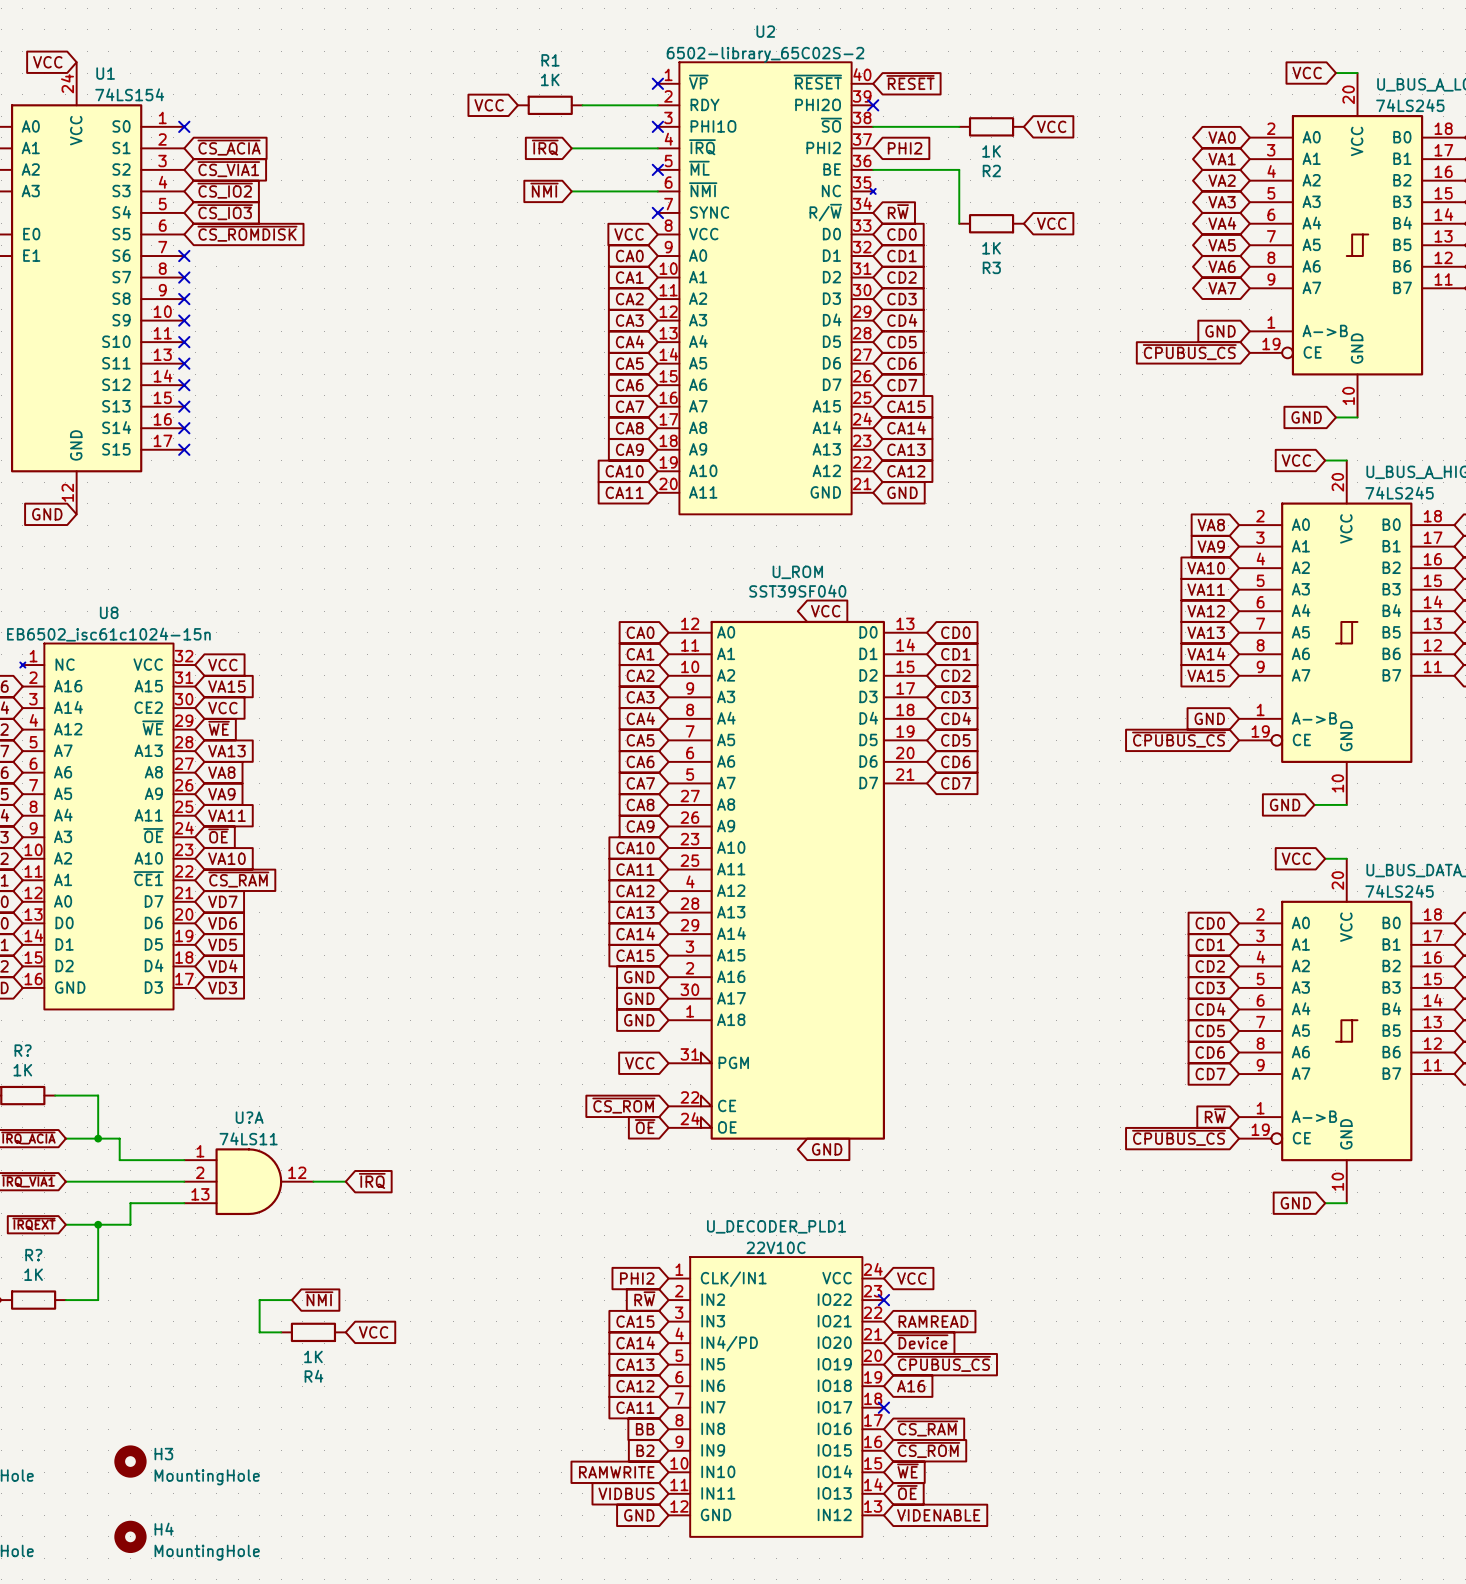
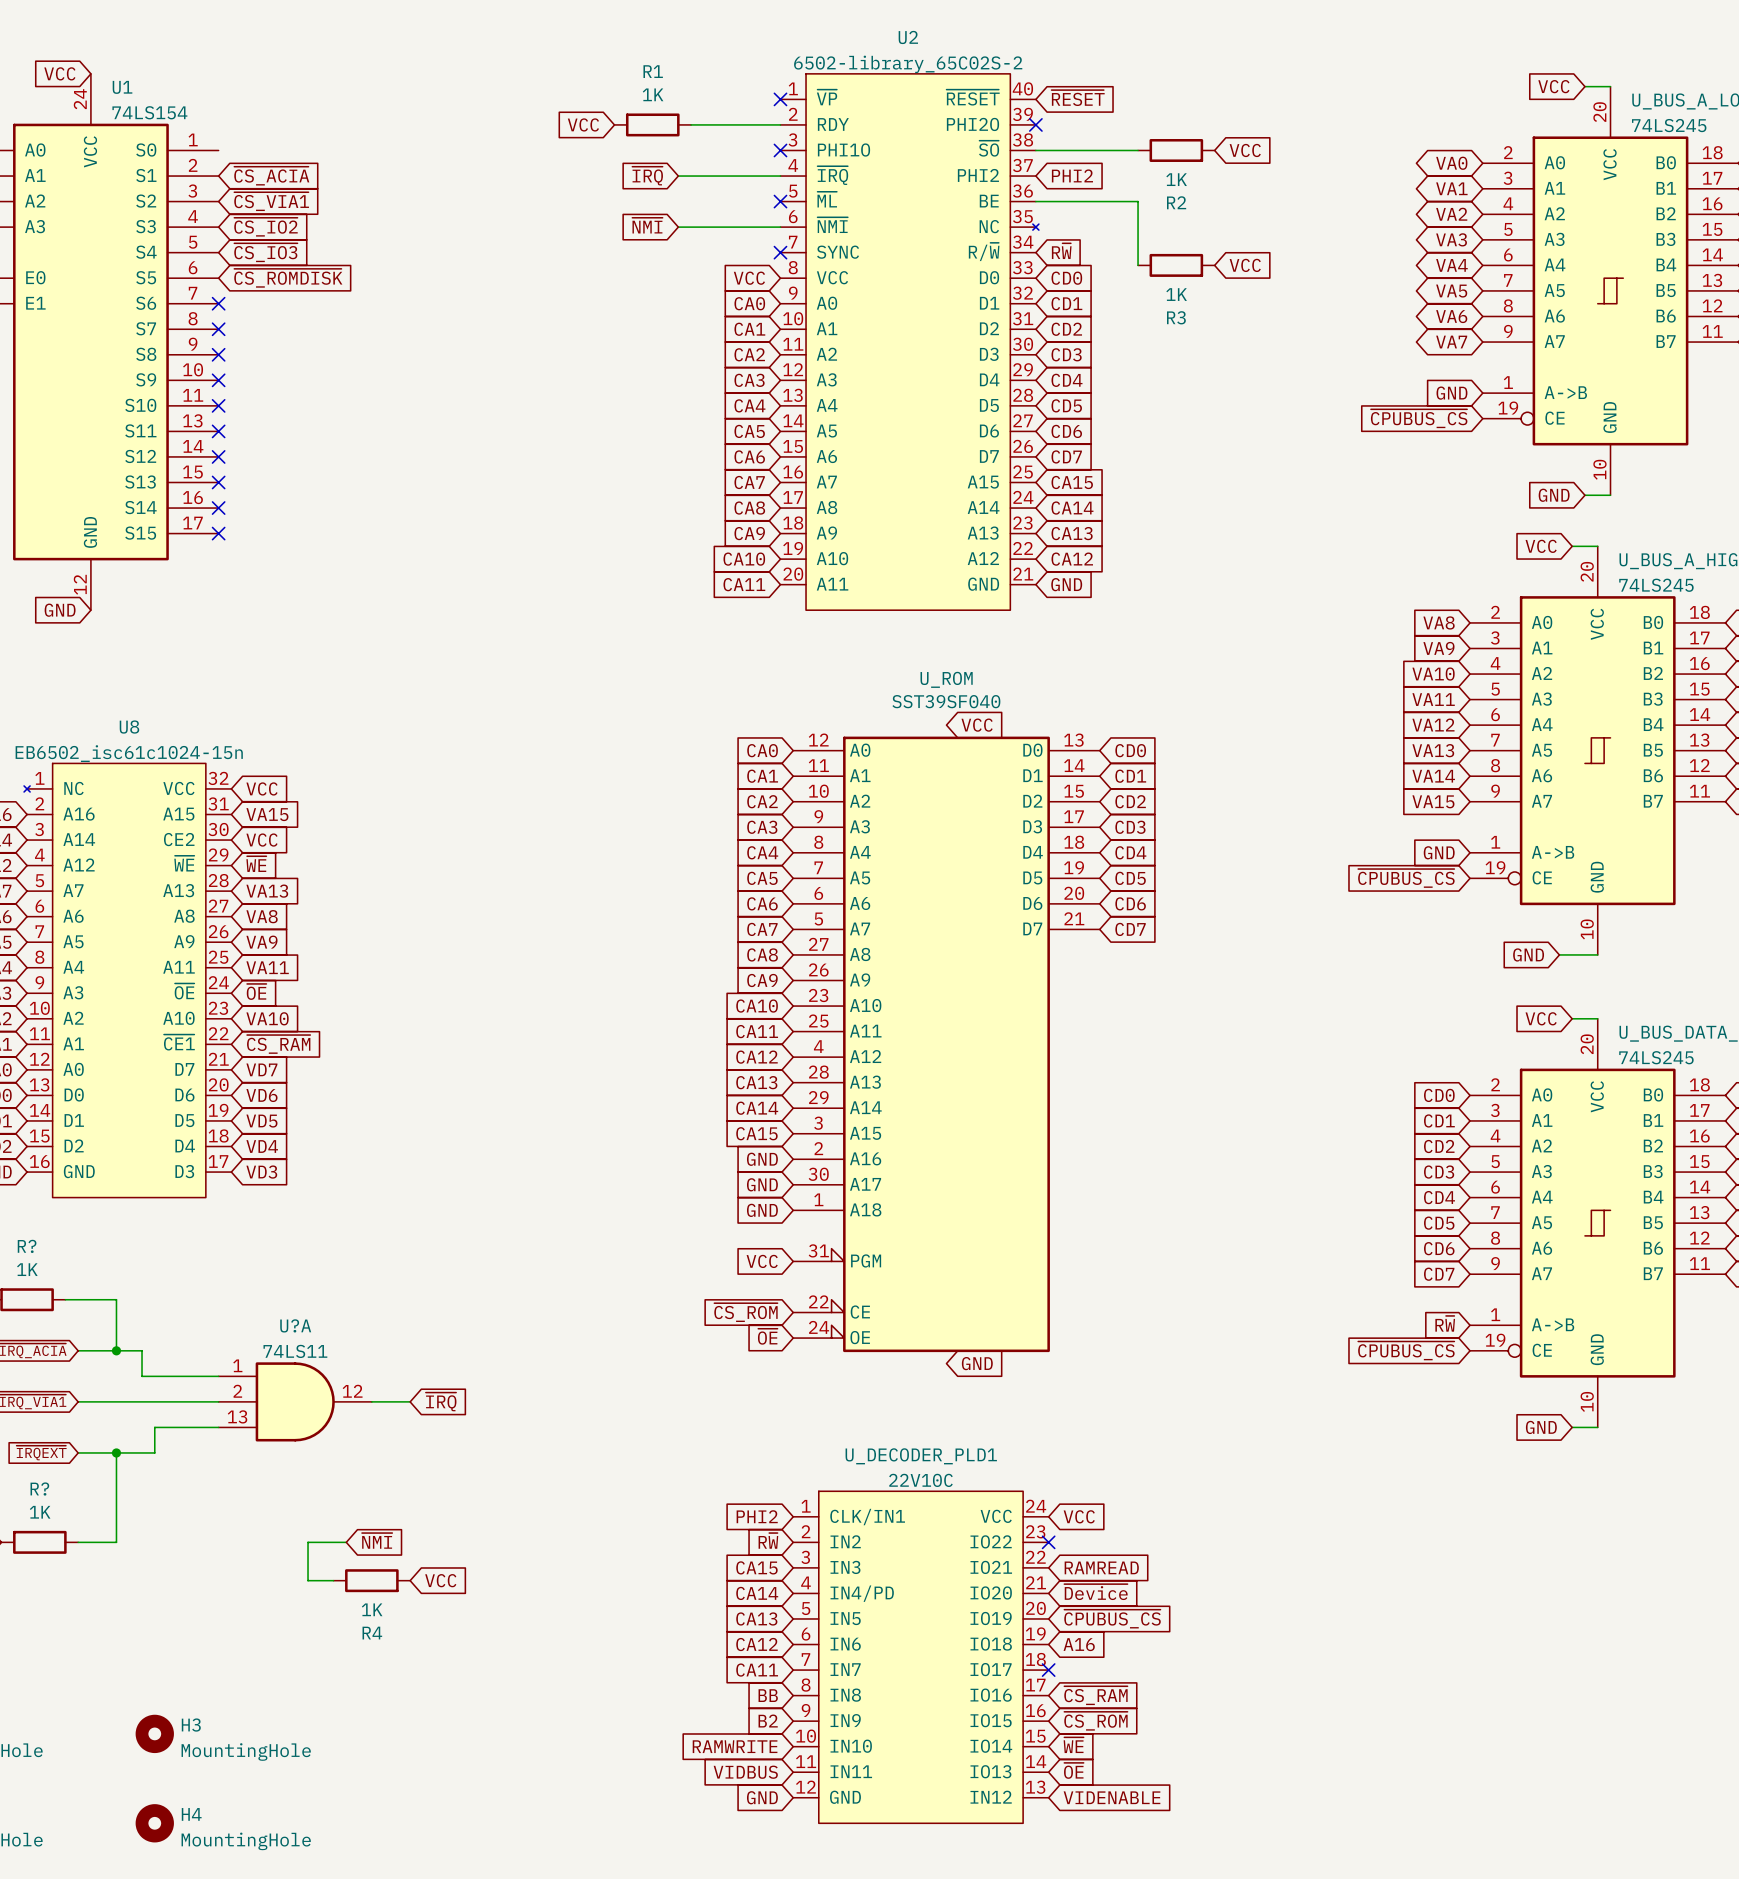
no-connect mark: (184, 126) -> none

